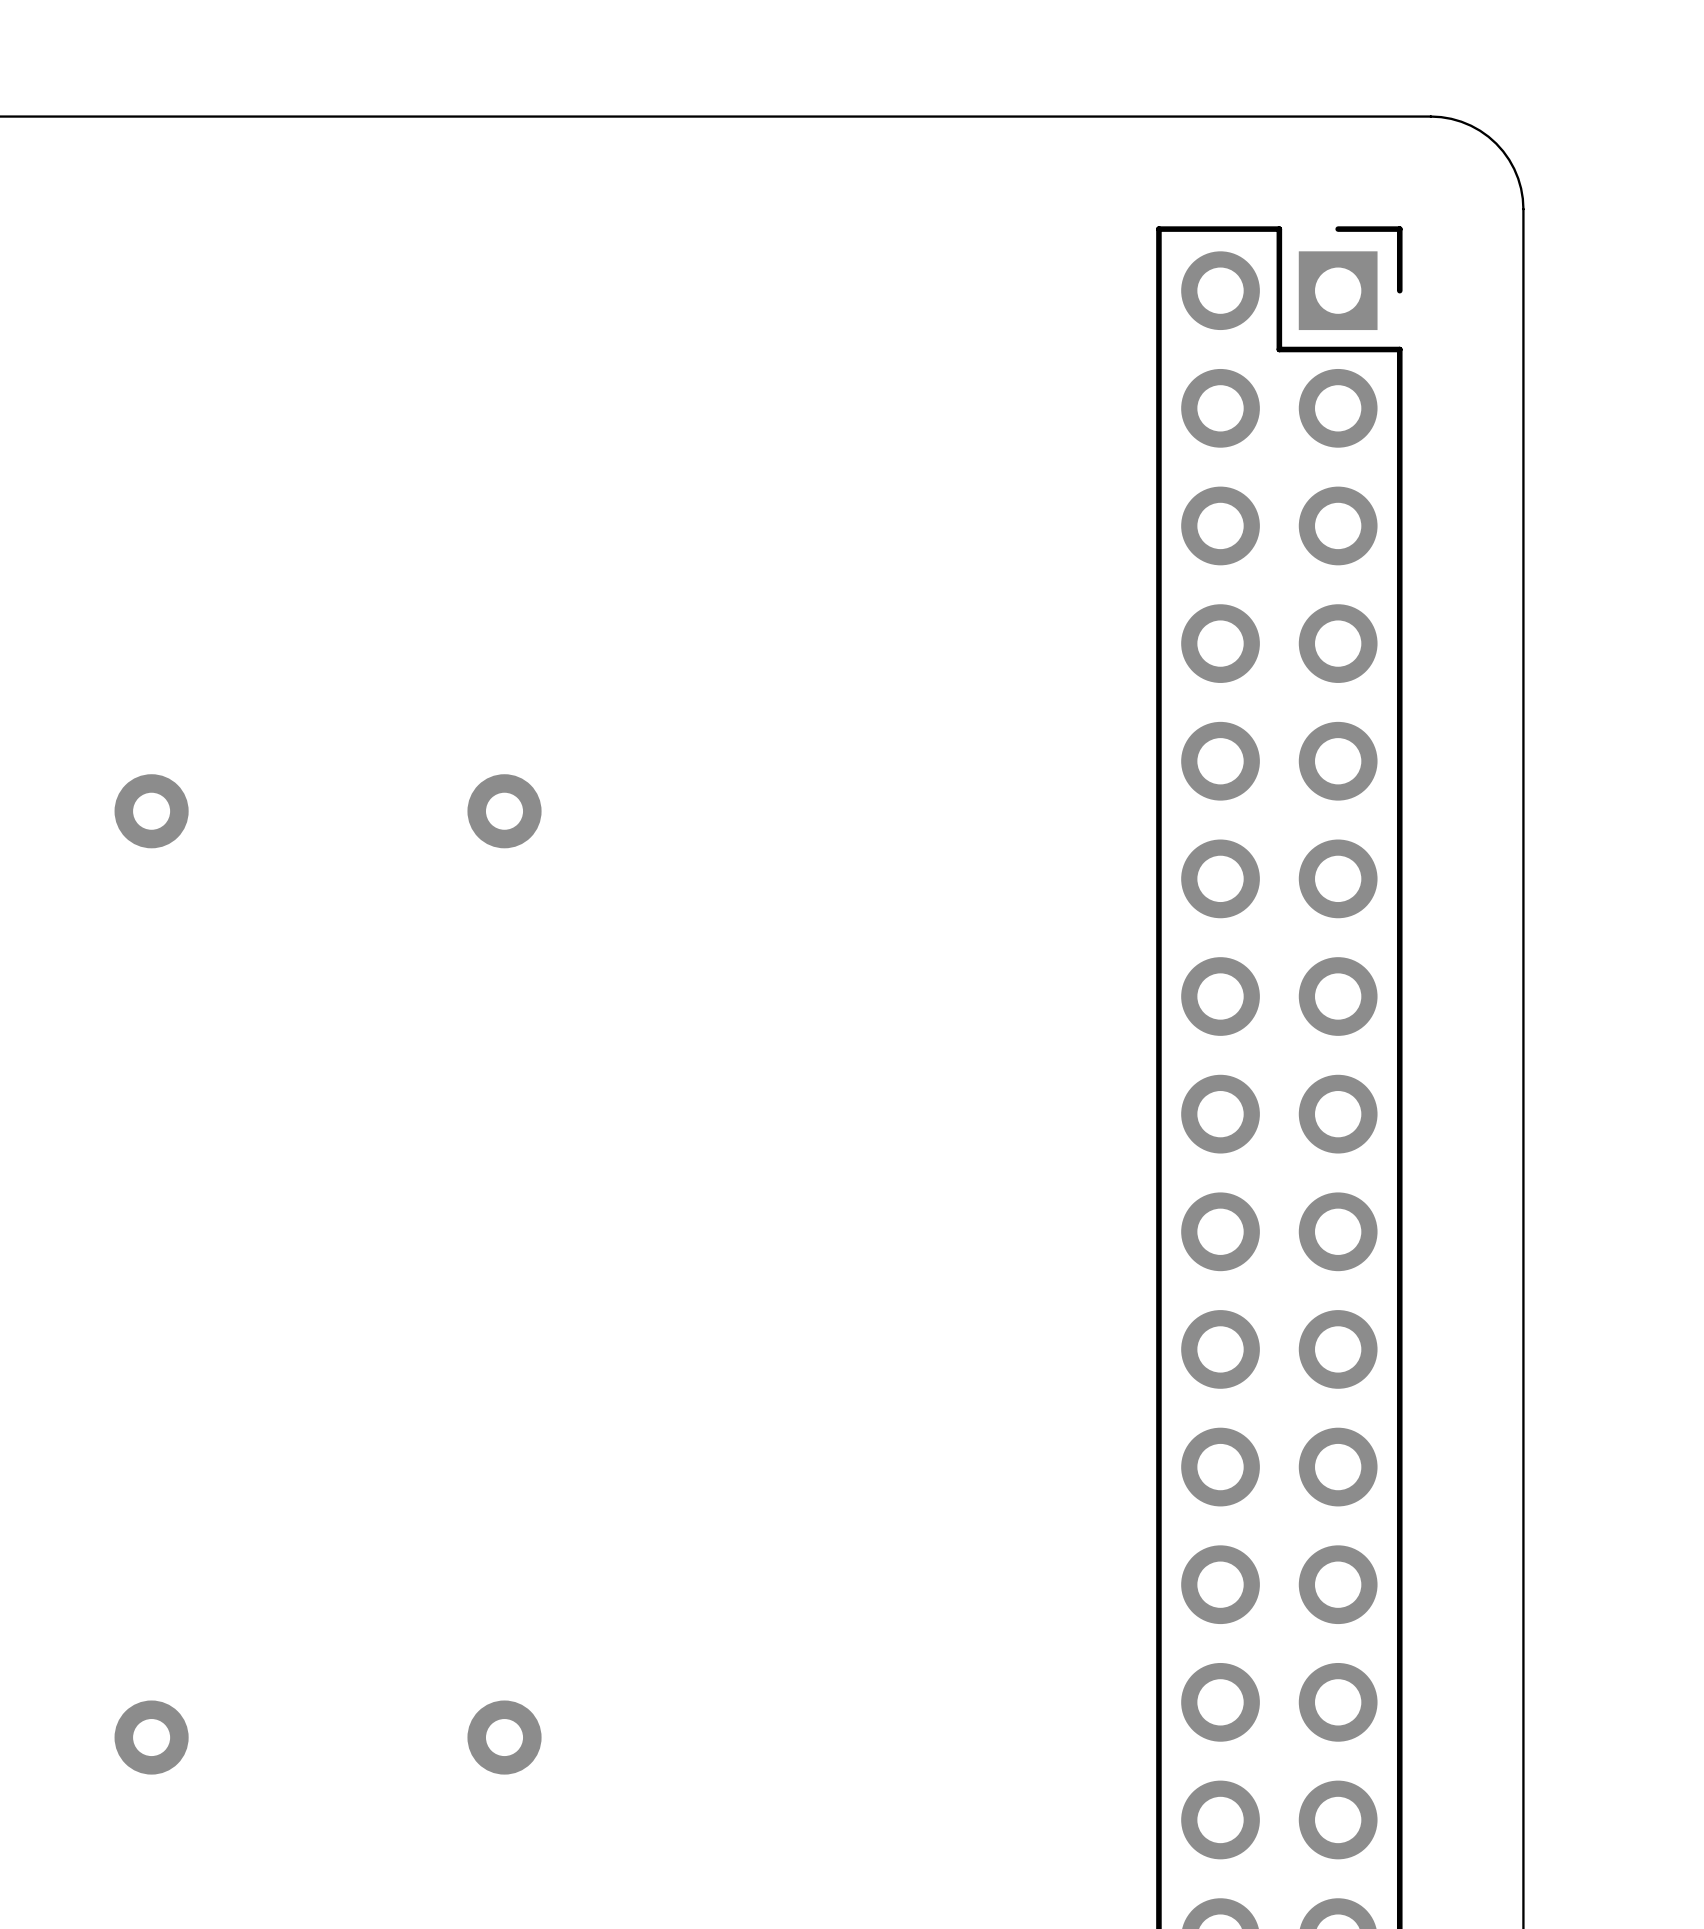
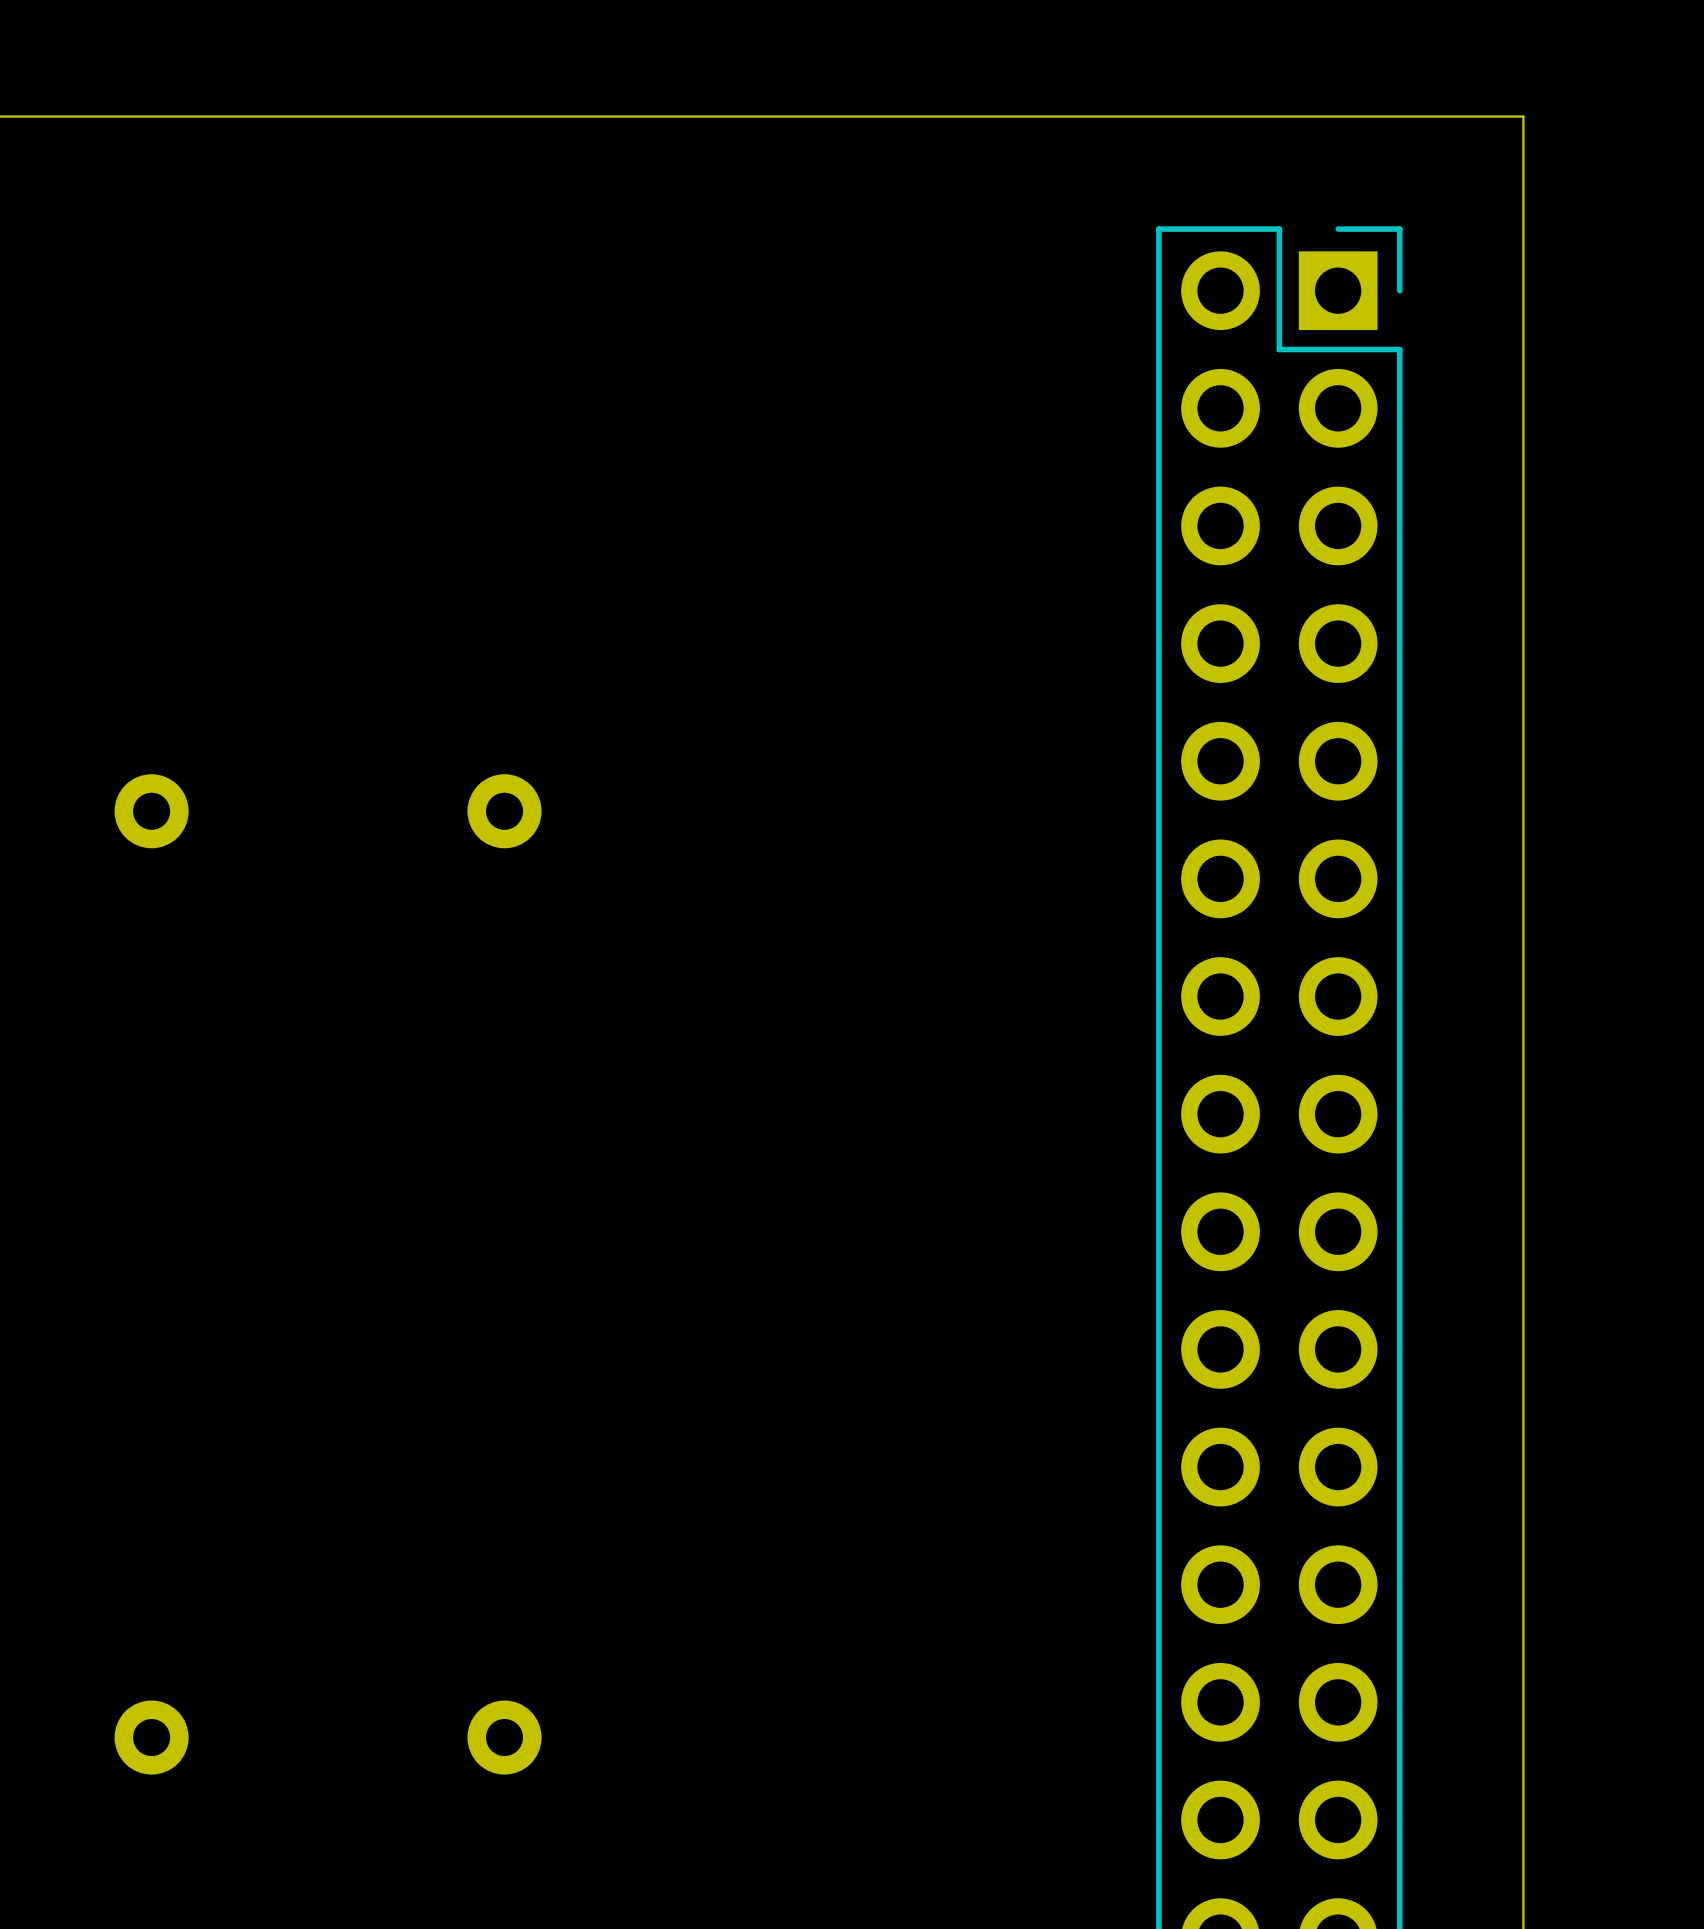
board edge: (1430, 116) (1461, 121) (1480, 130) (1496, 143) (1509, 159) (1518, 178) (1523, 209) -> (1430, 116) (1523, 116) (1523, 209)

